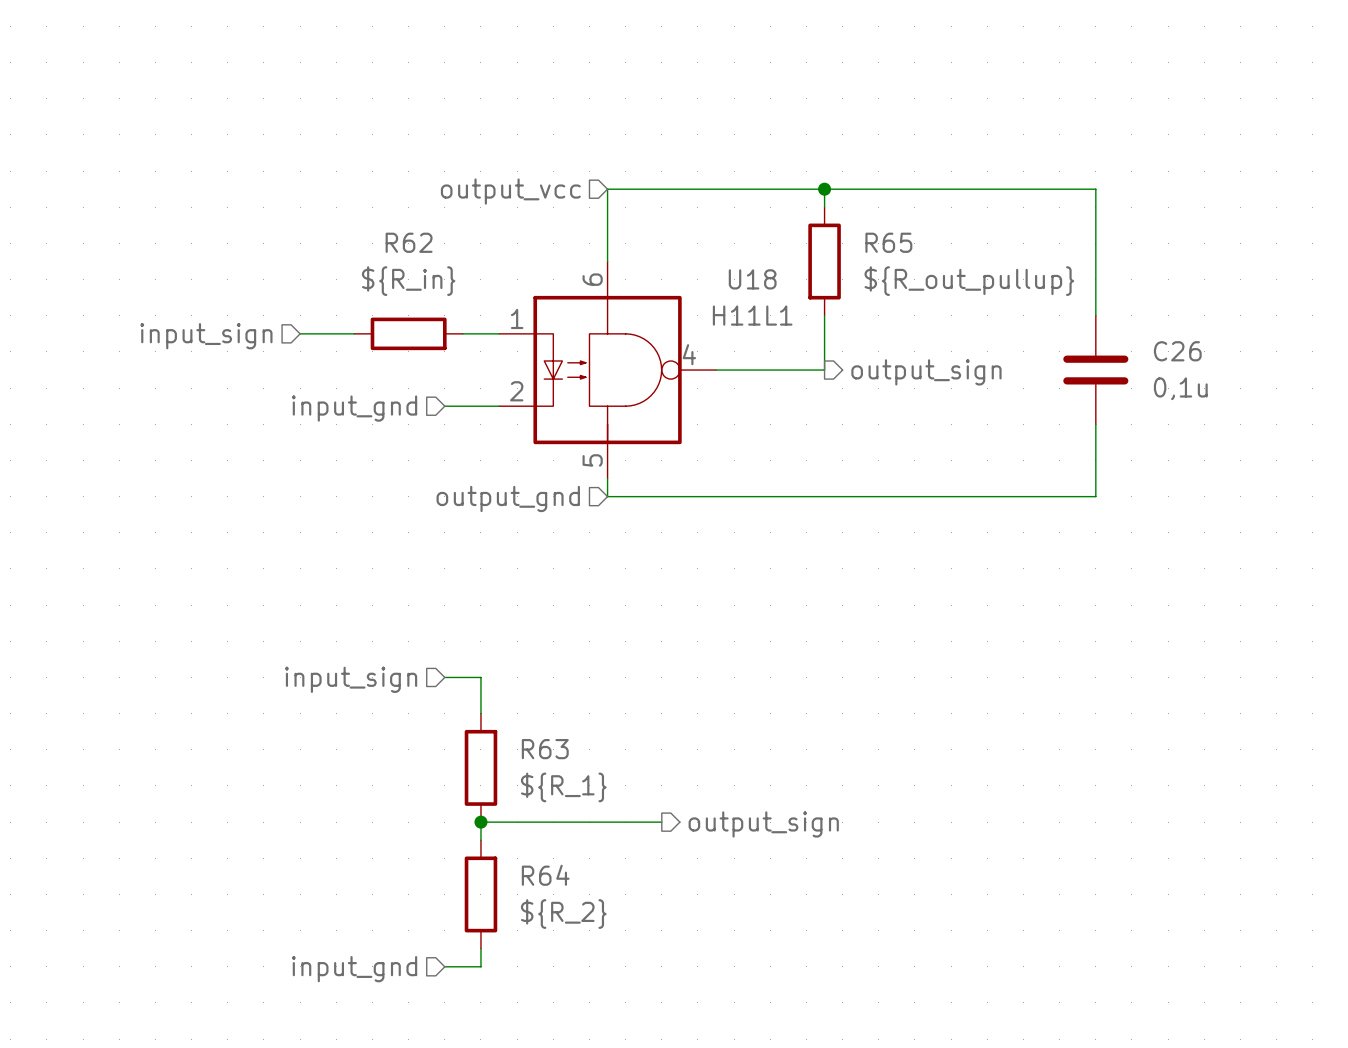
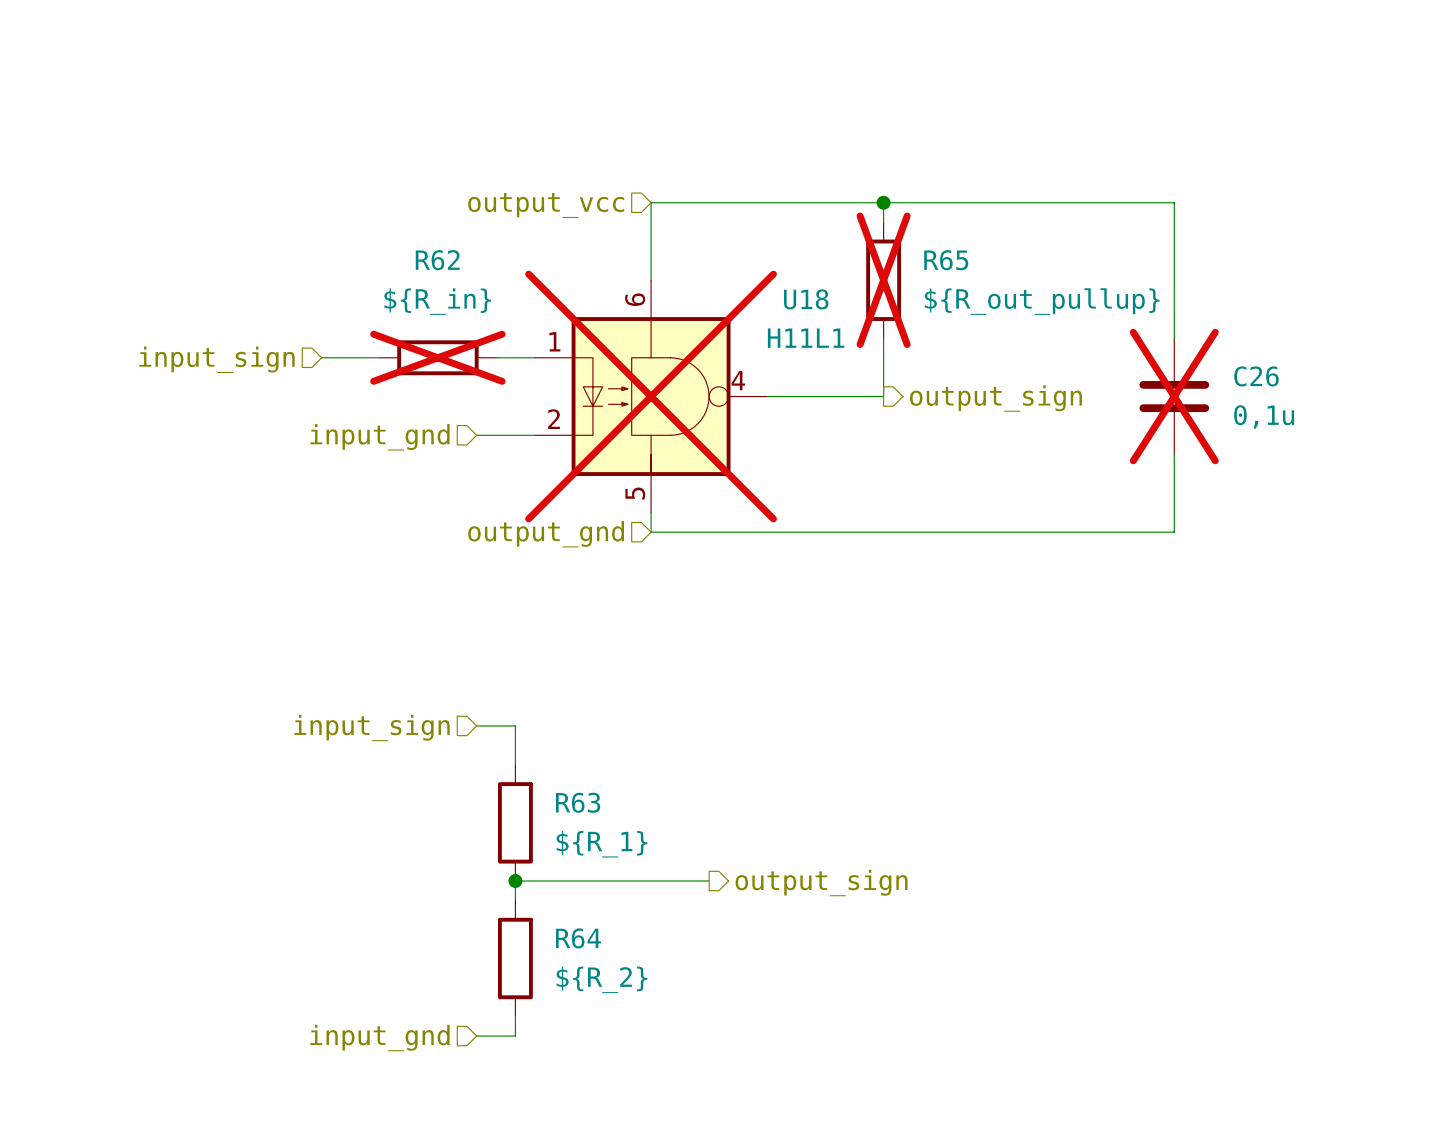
R65 do-not-place cross: none -> (883, 280)
R62 do-not-place cross: none -> (437, 357)
U18 do-not-place cross: none -> (651, 396)
C26 do-not-place cross: none -> (1174, 396)

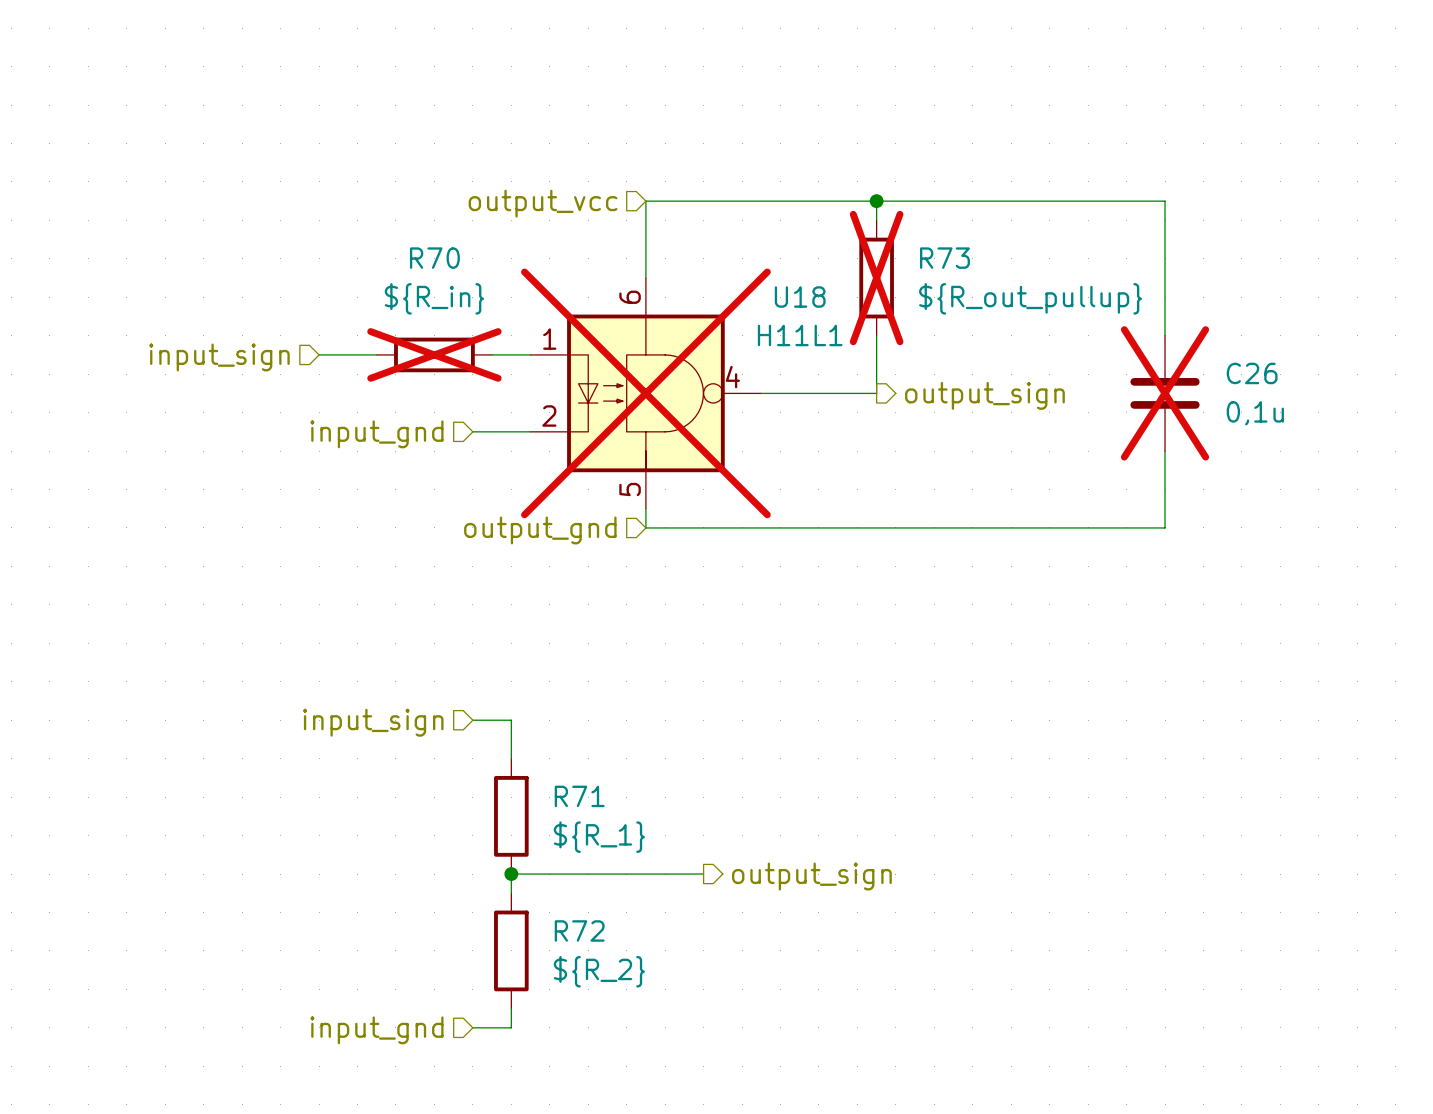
R62 name: R62 (437, 260) -> R70 (434, 258)
R65 name: R65 (946, 260) -> R73 (944, 258)
R63 name: R63 (578, 802) -> R71 (579, 796)
R64 name: R64 (578, 938) -> R72 (579, 930)

